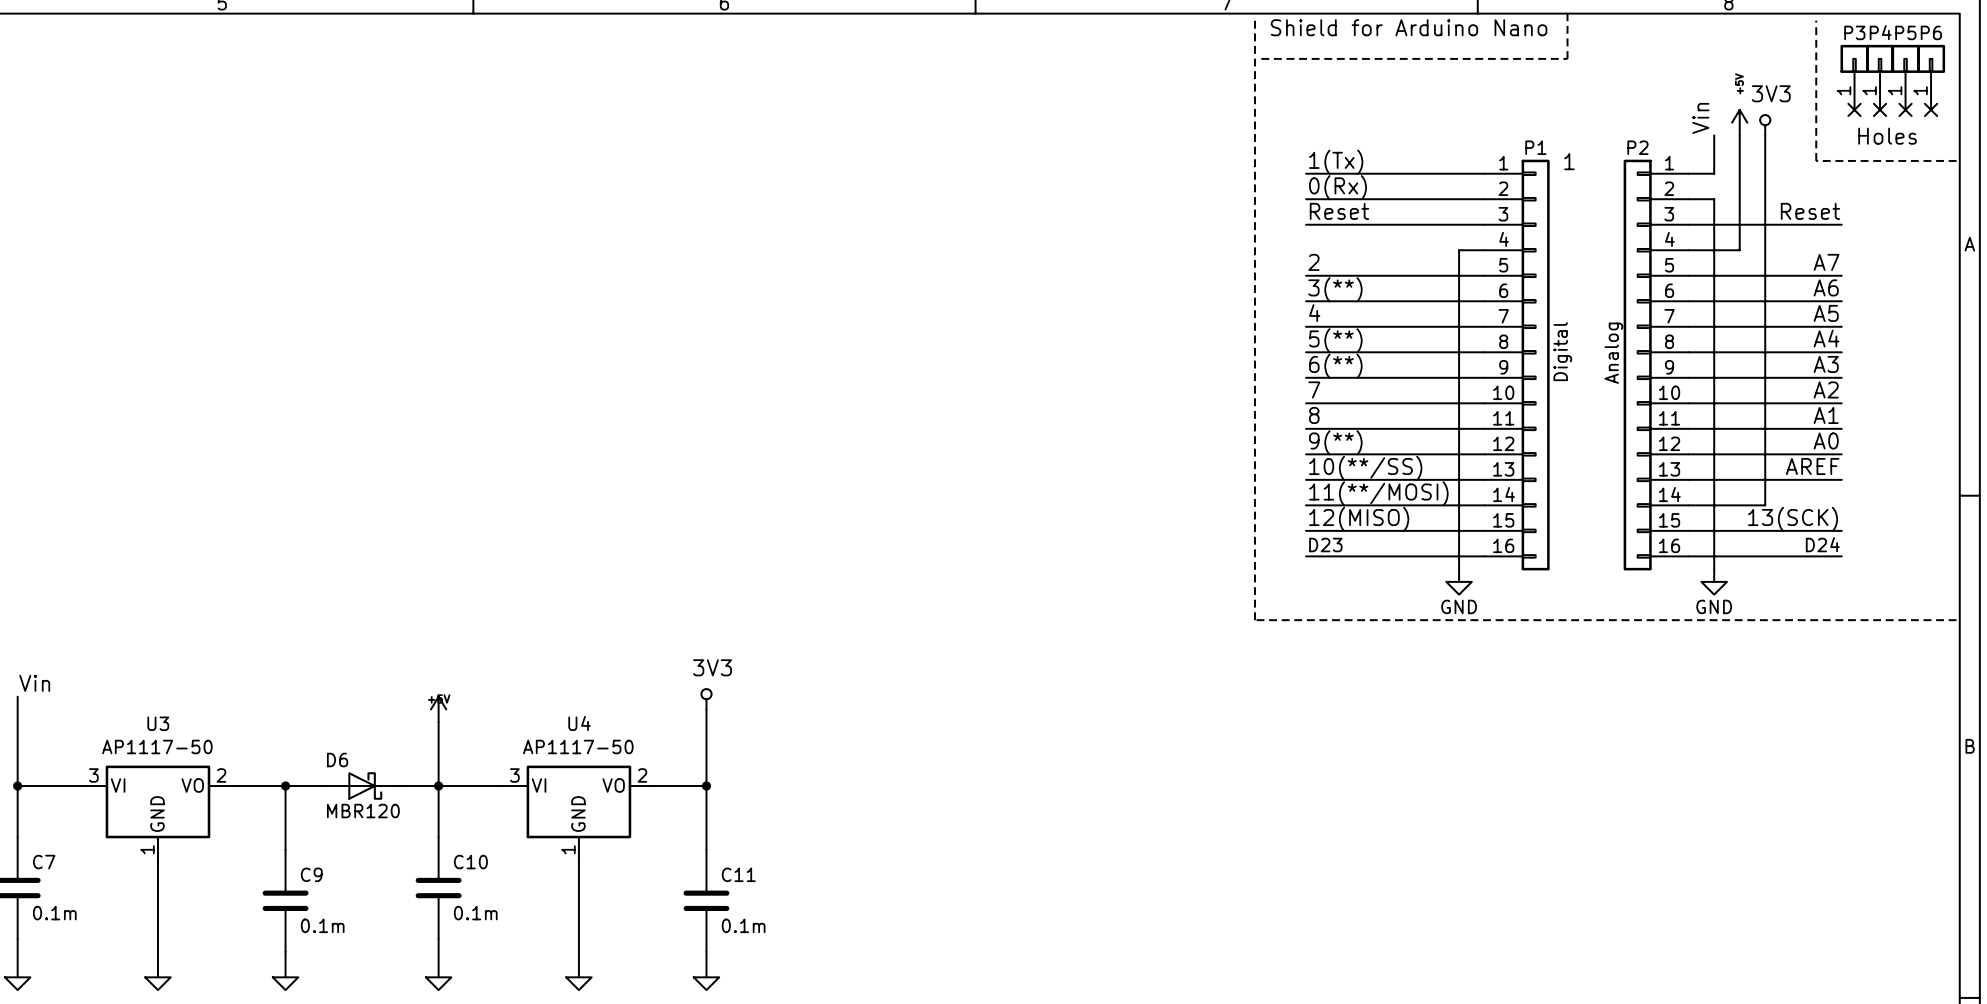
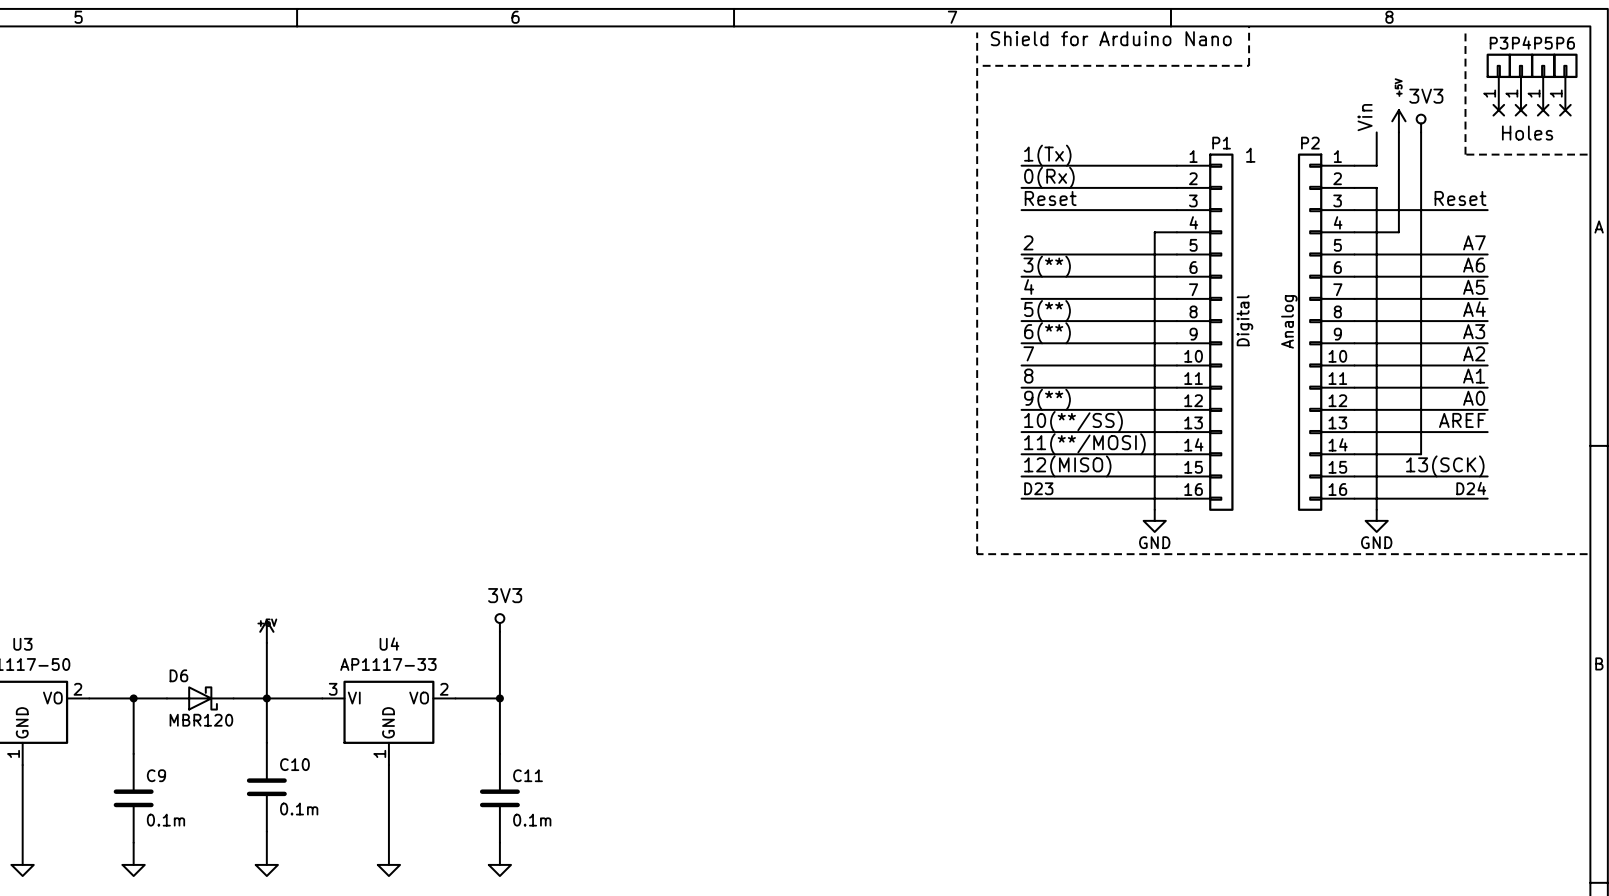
U4 value: AP1117-50 (578, 747) -> AP1117-33 (388, 664)

